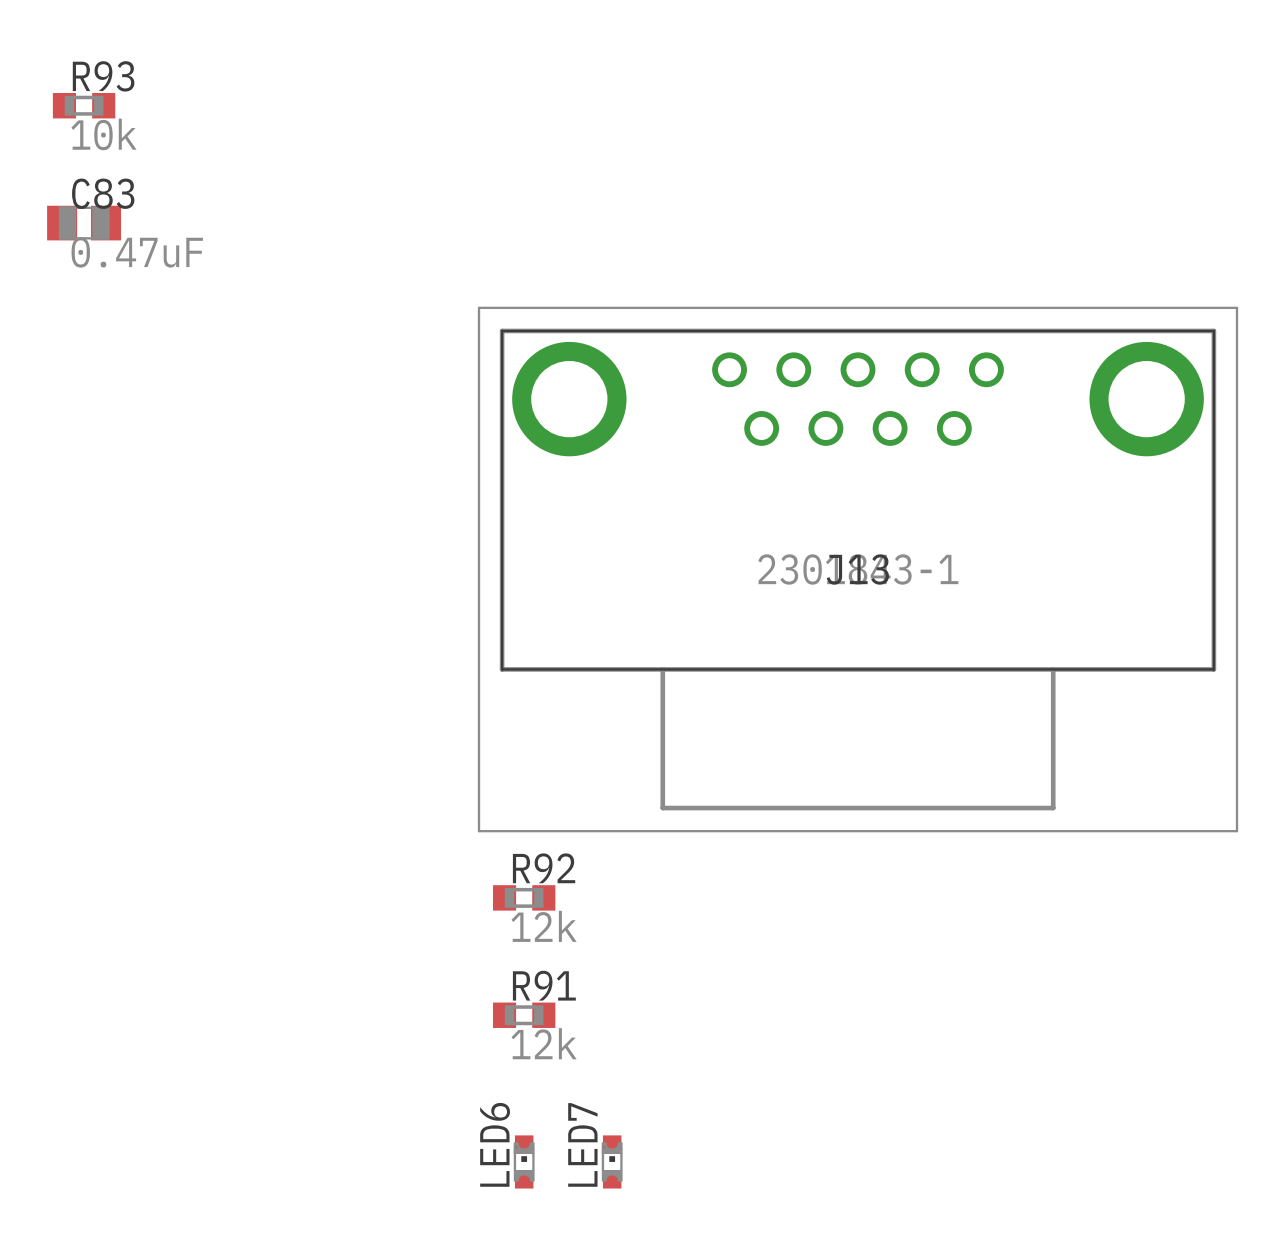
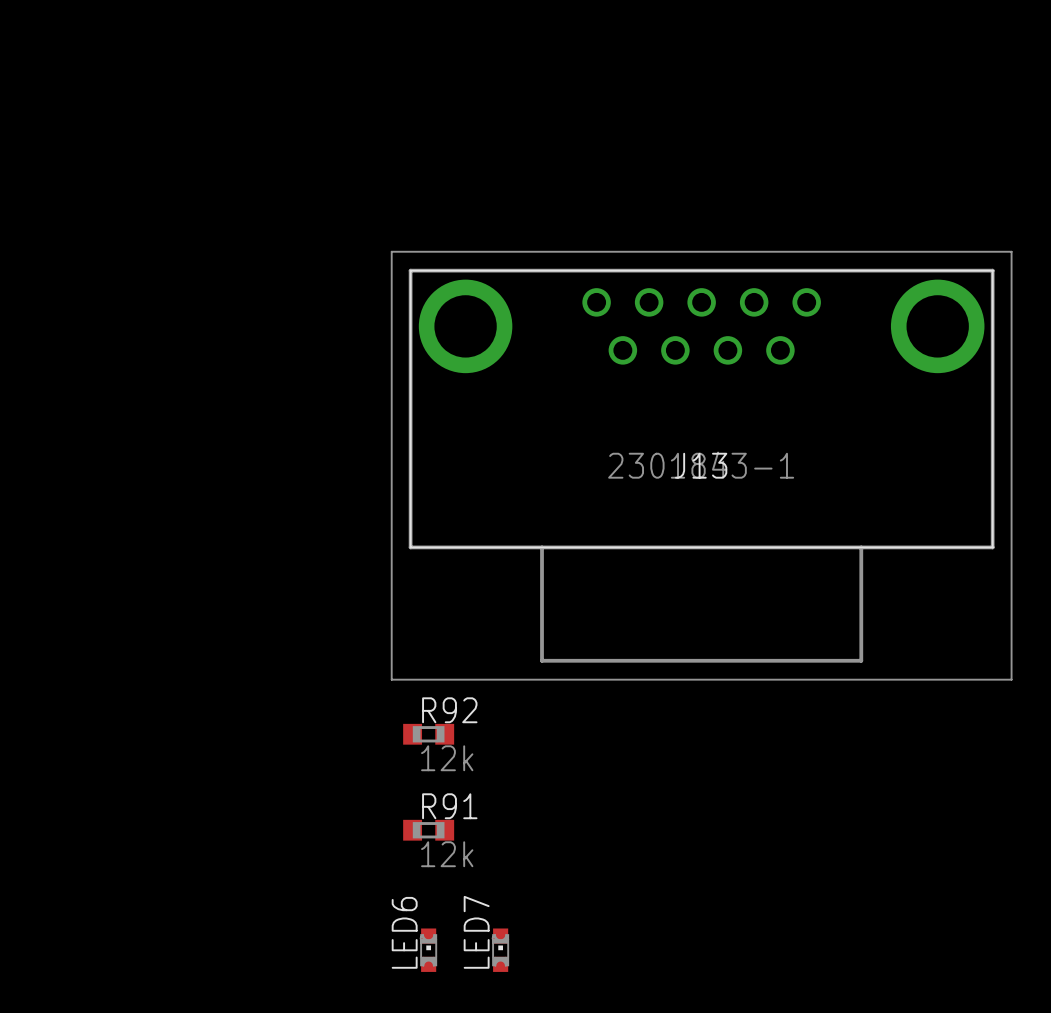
R93: 10k (84, 105) -> none
C83: 0.47uF (84, 223) -> none

